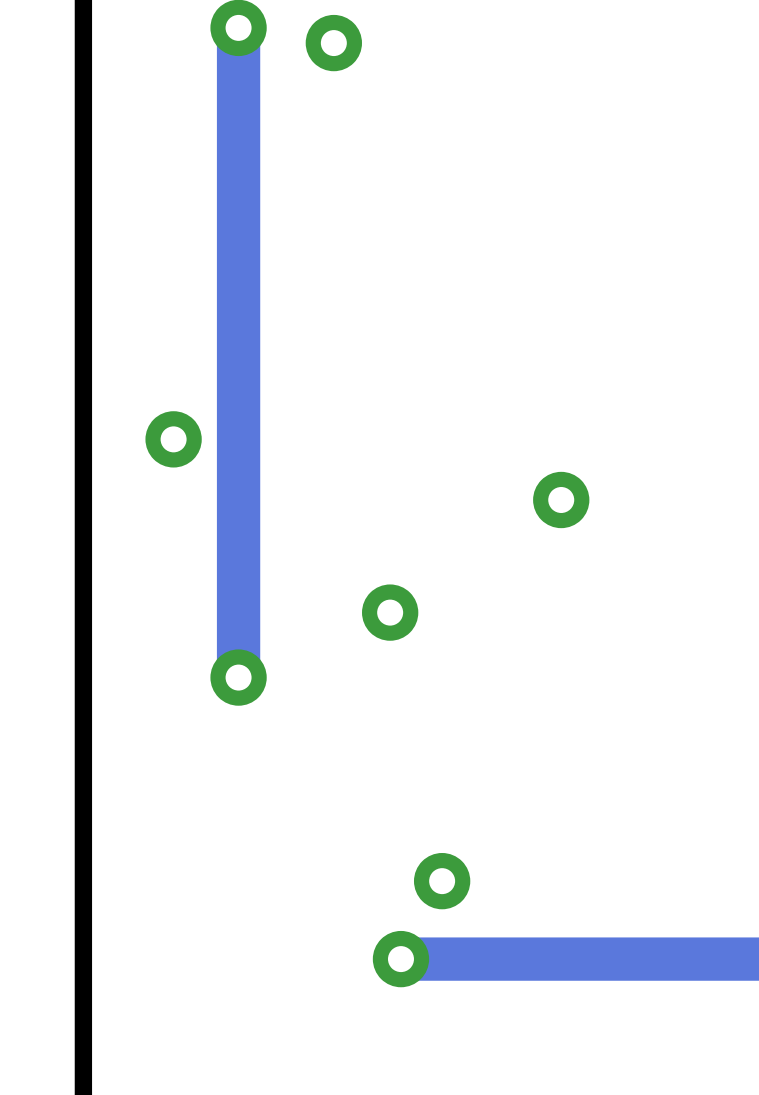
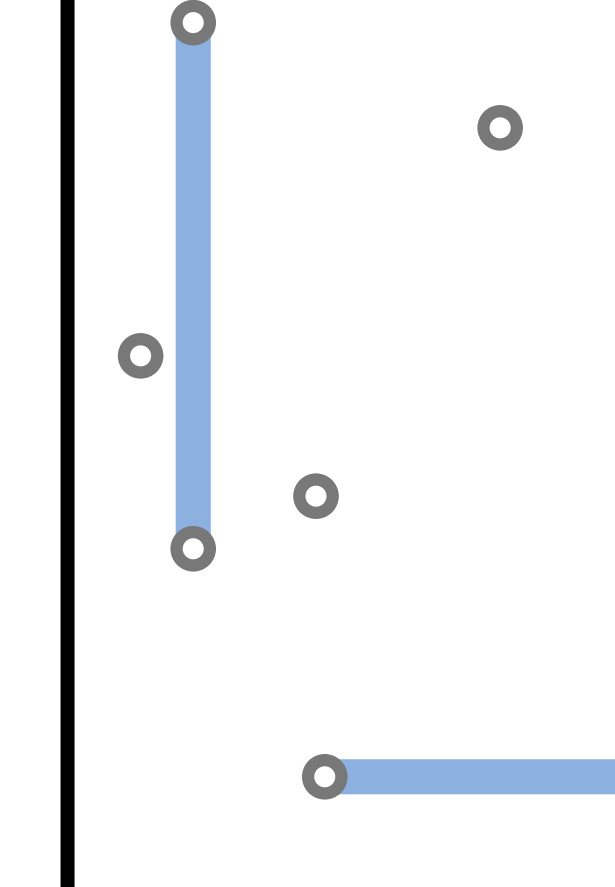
via: (333, 43) -> none
via: none -> (500, 127)
via: (561, 500) -> none
via: (442, 881) -> none

